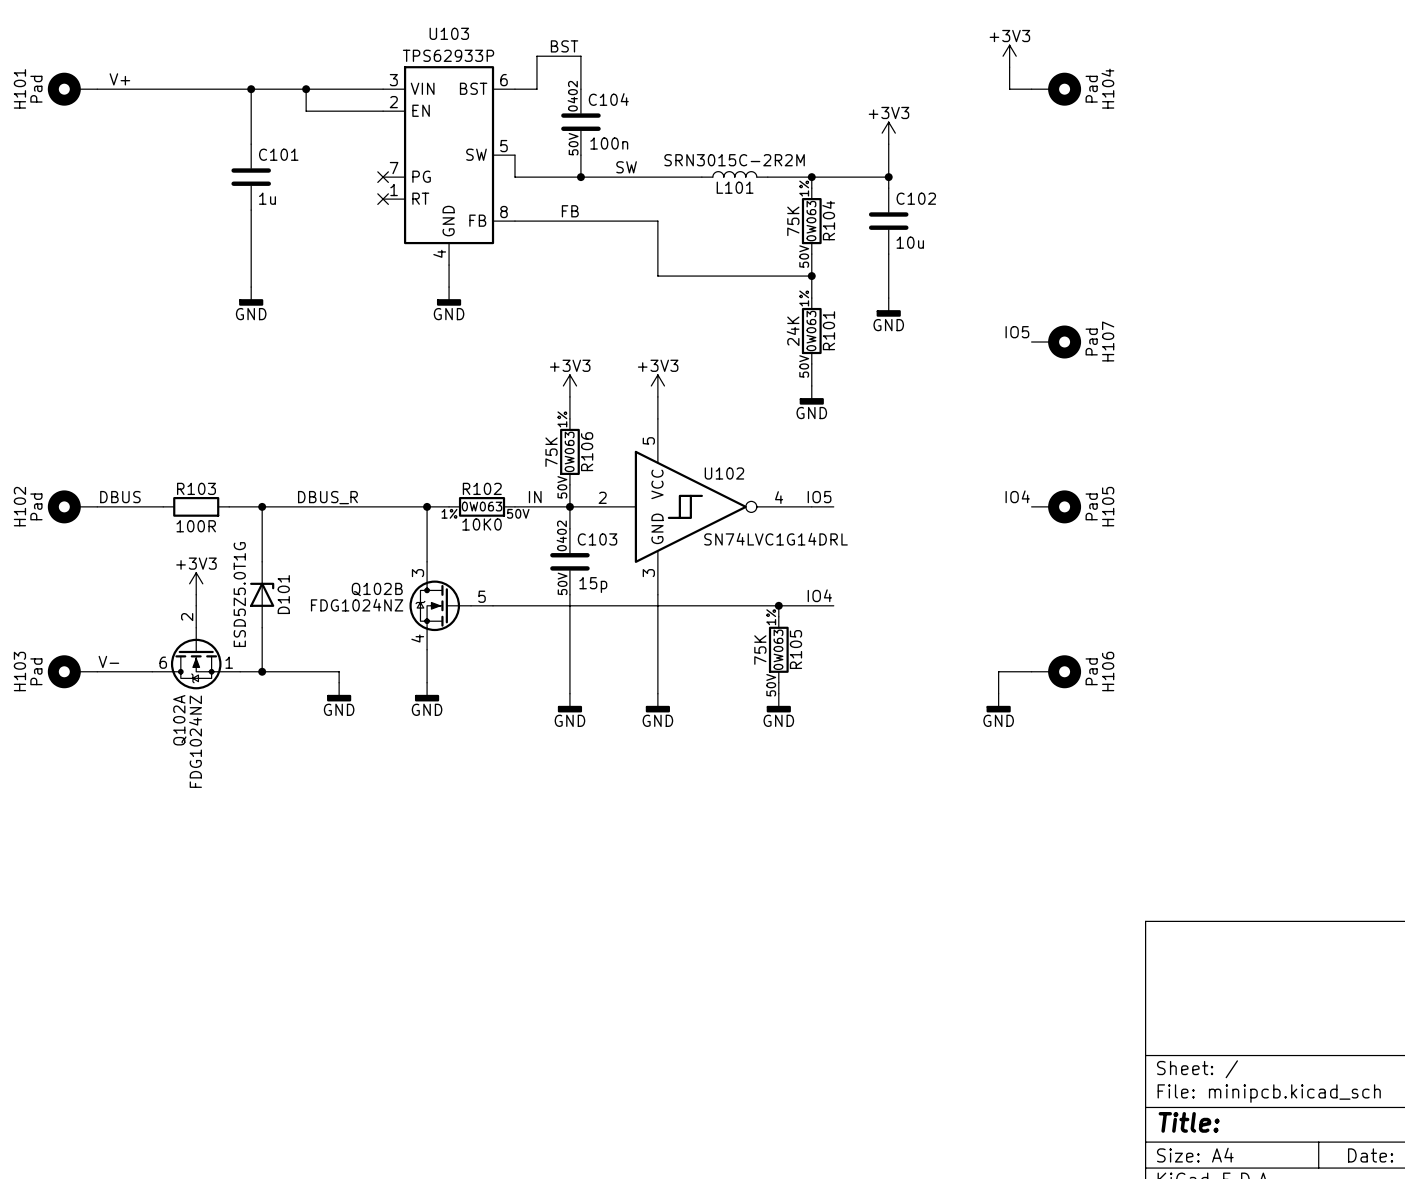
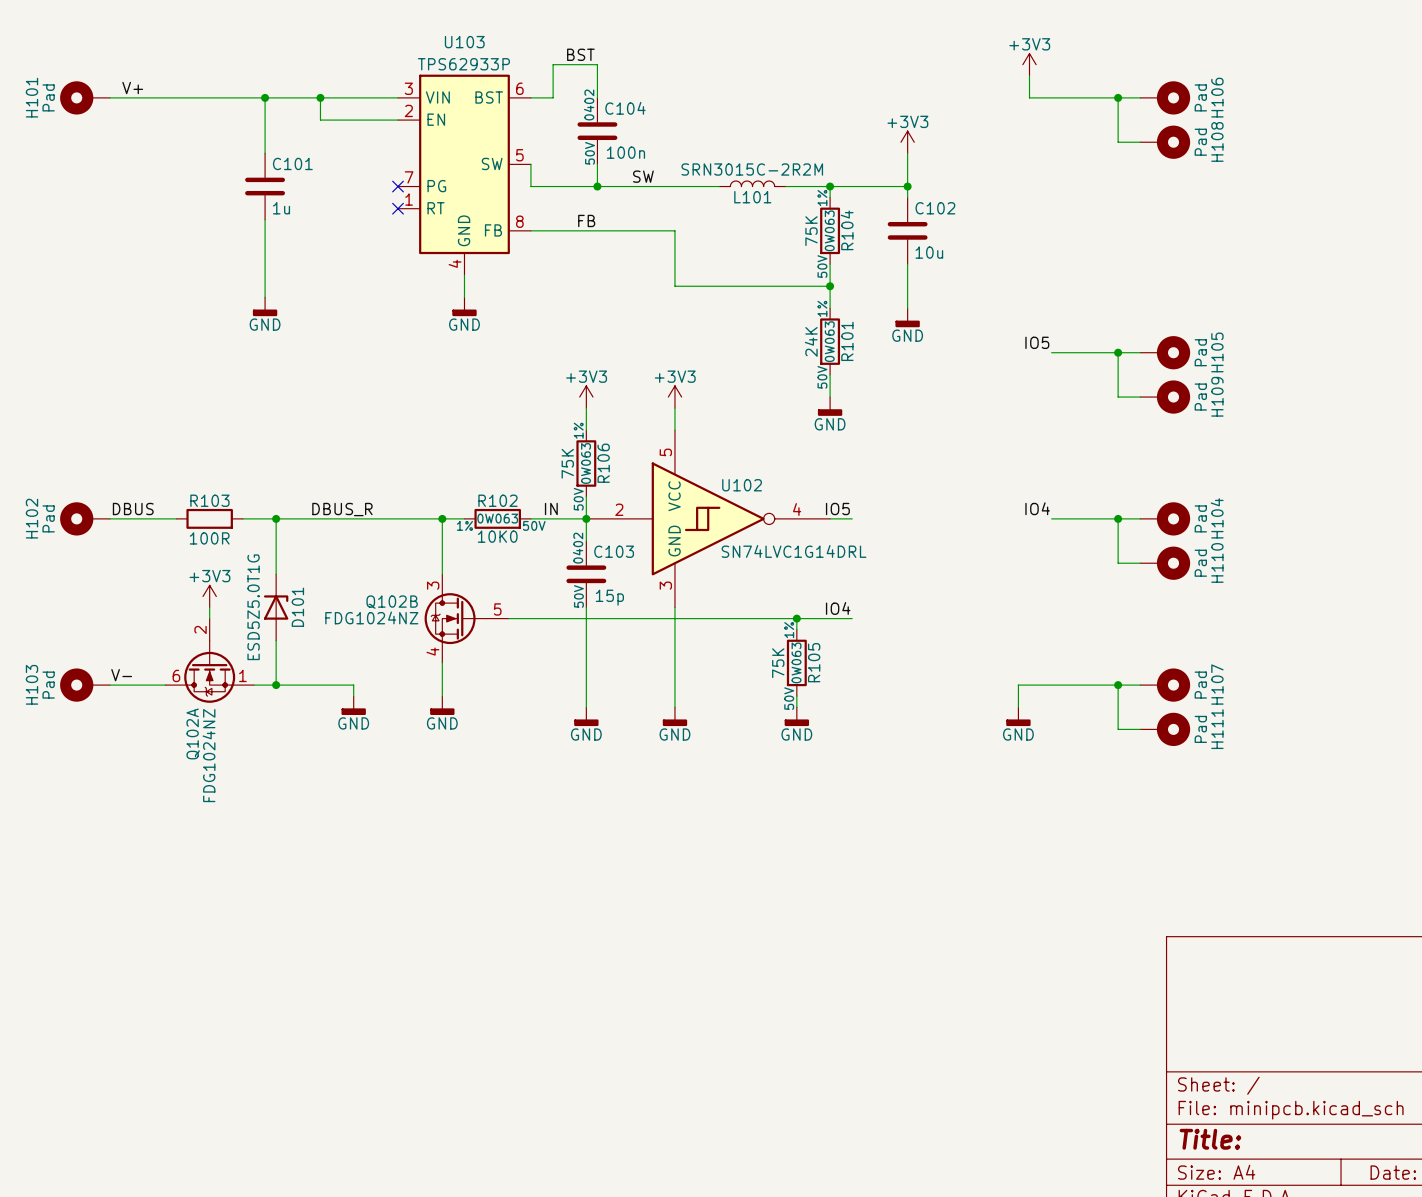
wire: none -> (1051, 97) (1140, 97)
H104 position: (1056, 89) -> (1165, 518)
wire: none -> (1118, 97) (1118, 142) (1140, 142)
junction: none -> (1118, 97)
H108: none -> Pad (1165, 142)
wire: none -> (1051, 352) (1140, 352)
H107 position: (1056, 342) -> (1165, 685)
wire: none -> (1118, 352) (1118, 397) (1140, 397)
junction: none -> (1118, 352)
H109: none -> Pad (1165, 397)
wire: none -> (1051, 518) (1140, 518)
H105 position: (1056, 506) -> (1165, 352)
wire: none -> (1118, 518) (1118, 563) (1140, 563)
junction: none -> (1118, 518)
H110: none -> Pad (1165, 563)
wire: none -> (1051, 685) (1140, 685)
H106 position: (1056, 671) -> (1165, 97)
wire: none -> (1118, 685) (1118, 729) (1140, 729)
junction: none -> (1118, 685)
H111: none -> Pad (1165, 729)

